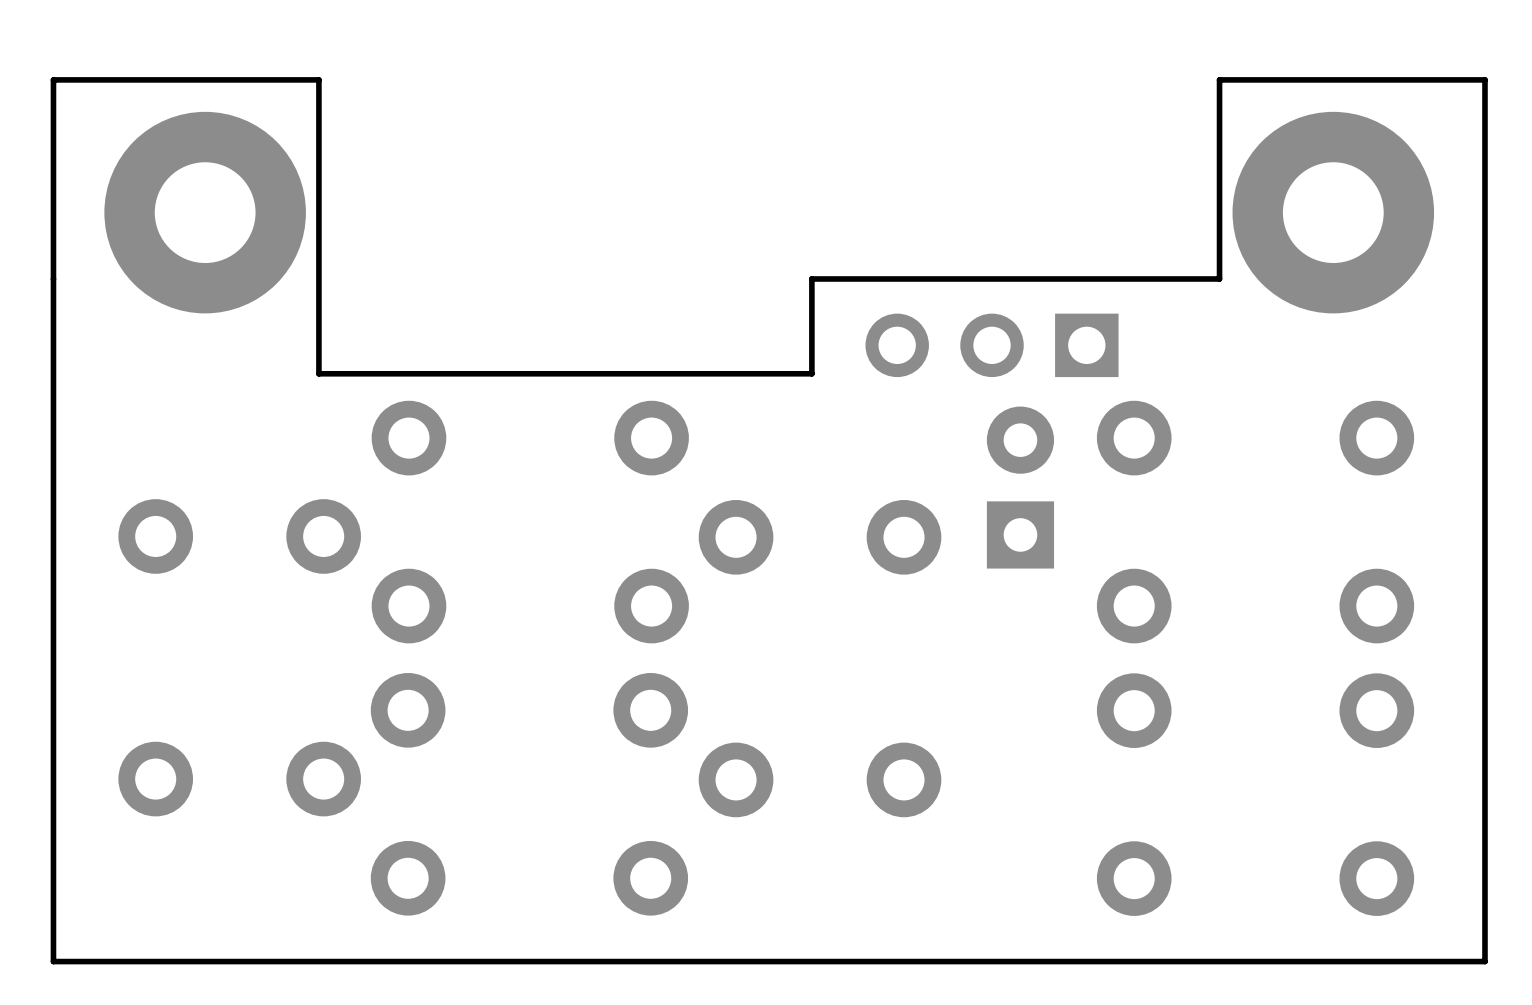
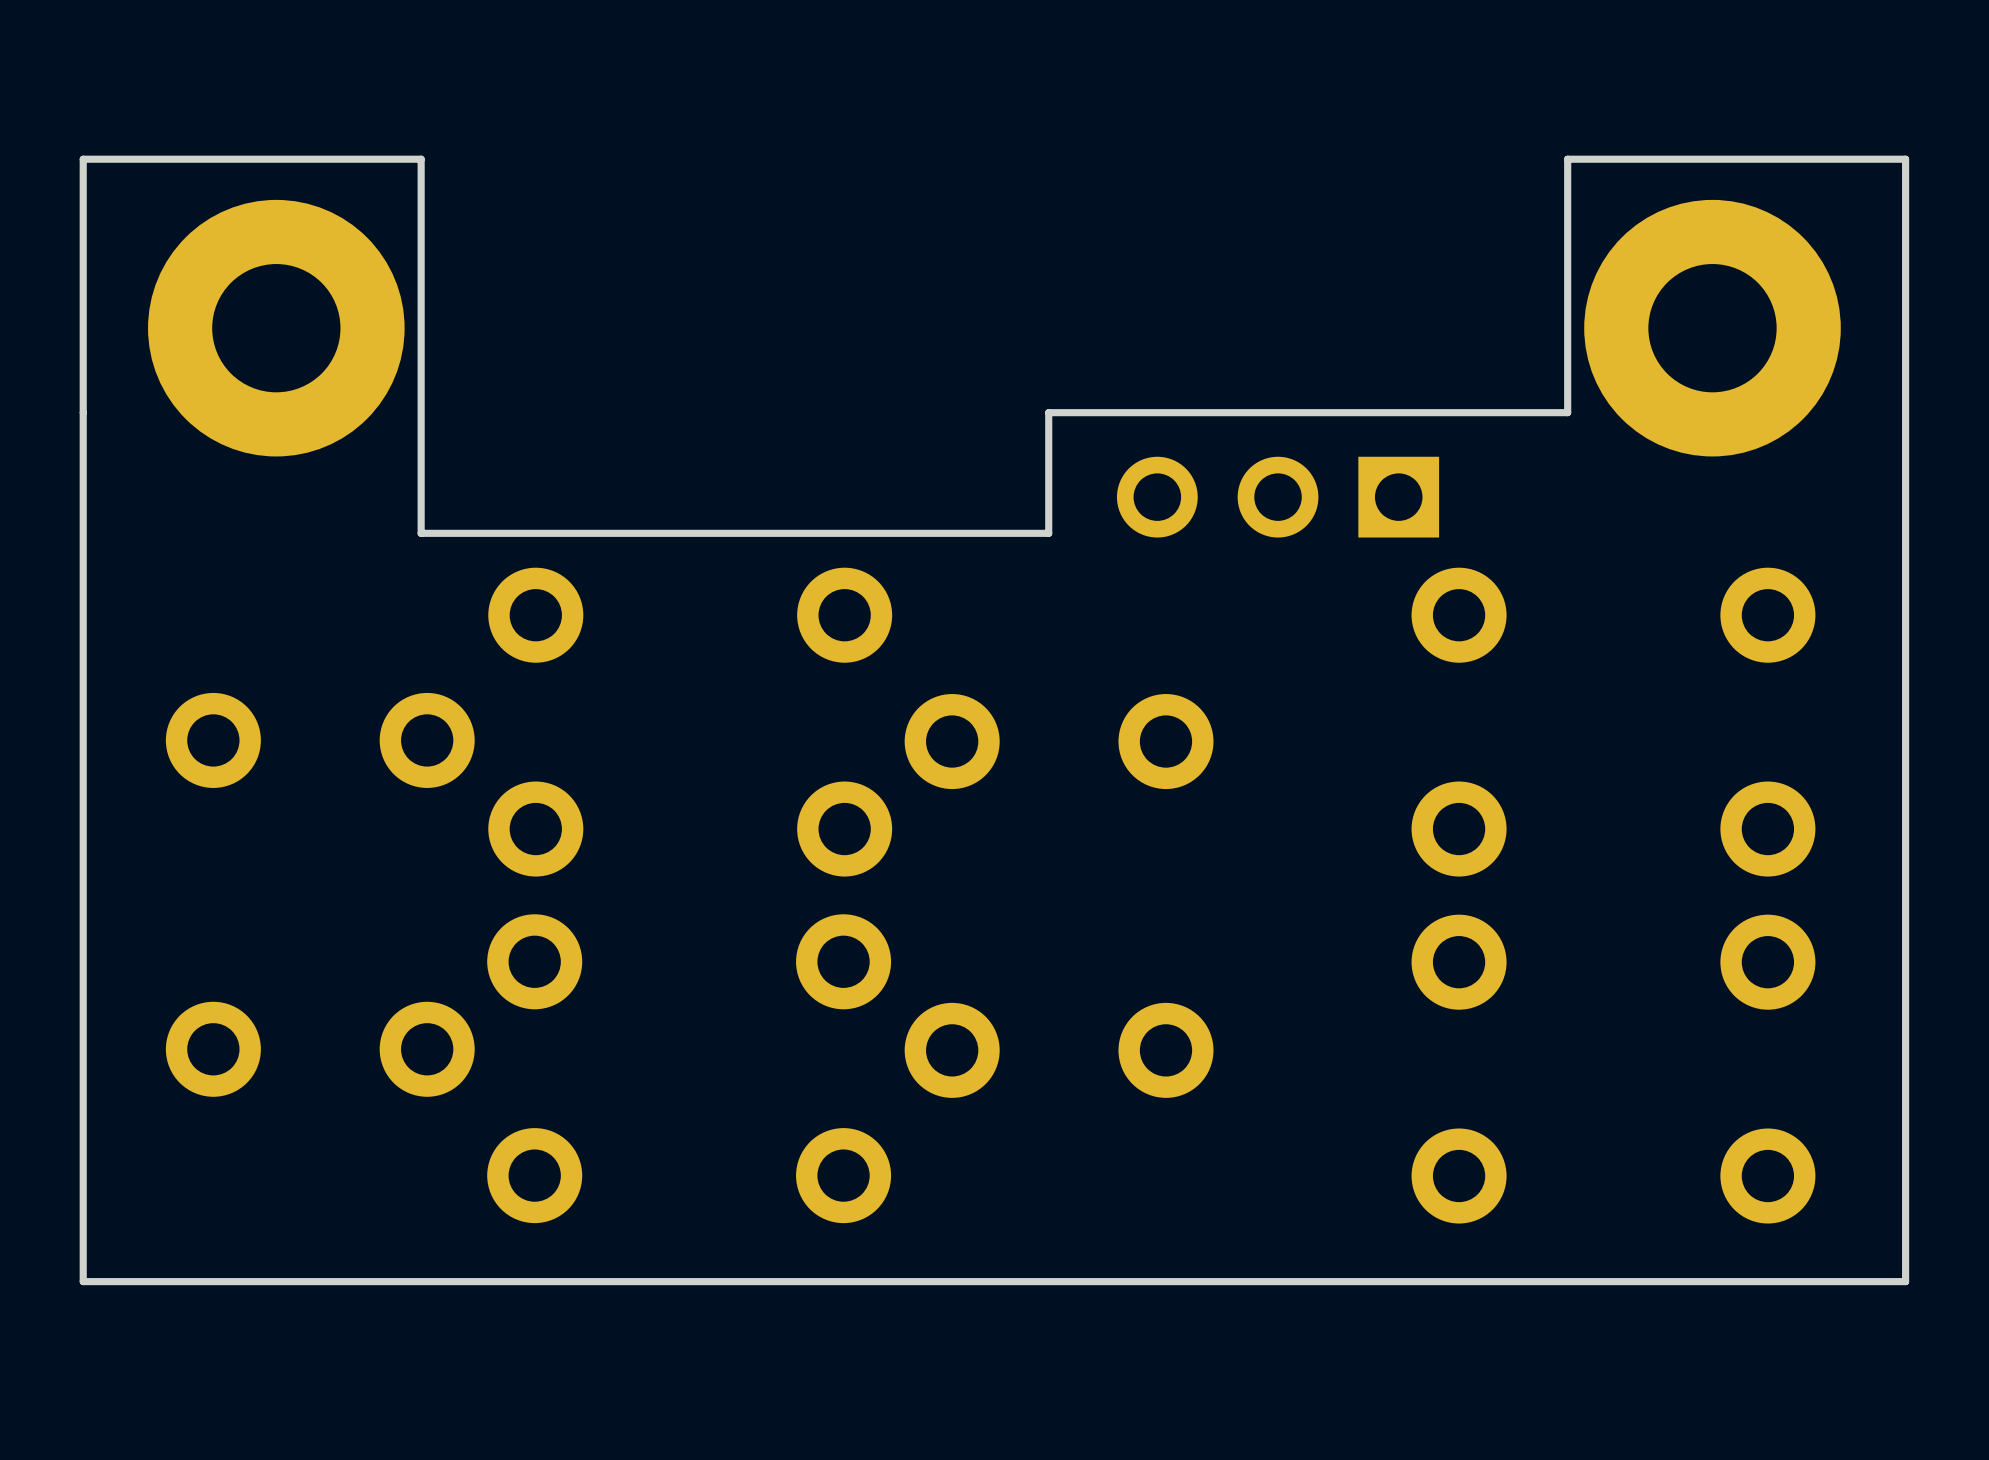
part: (1020, 487) -> none

